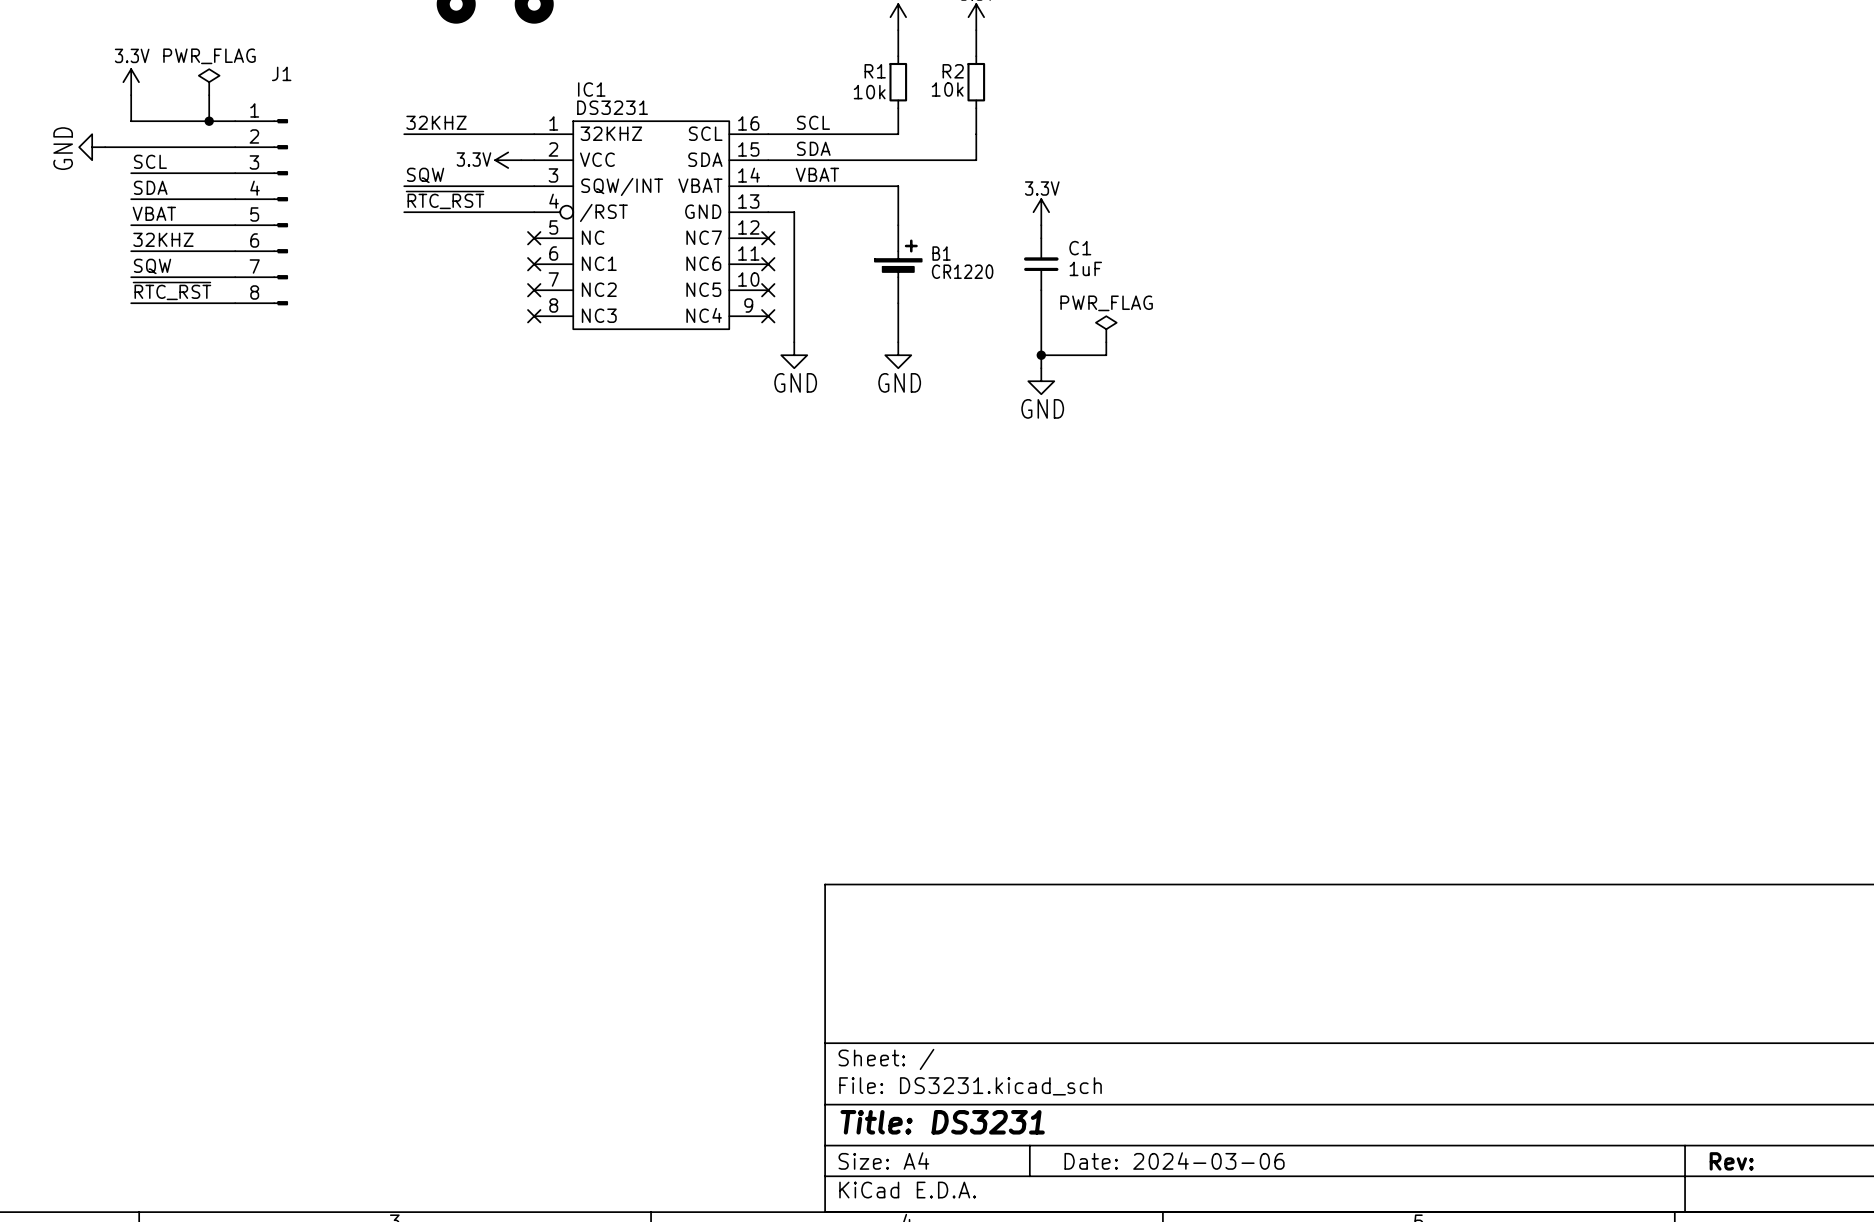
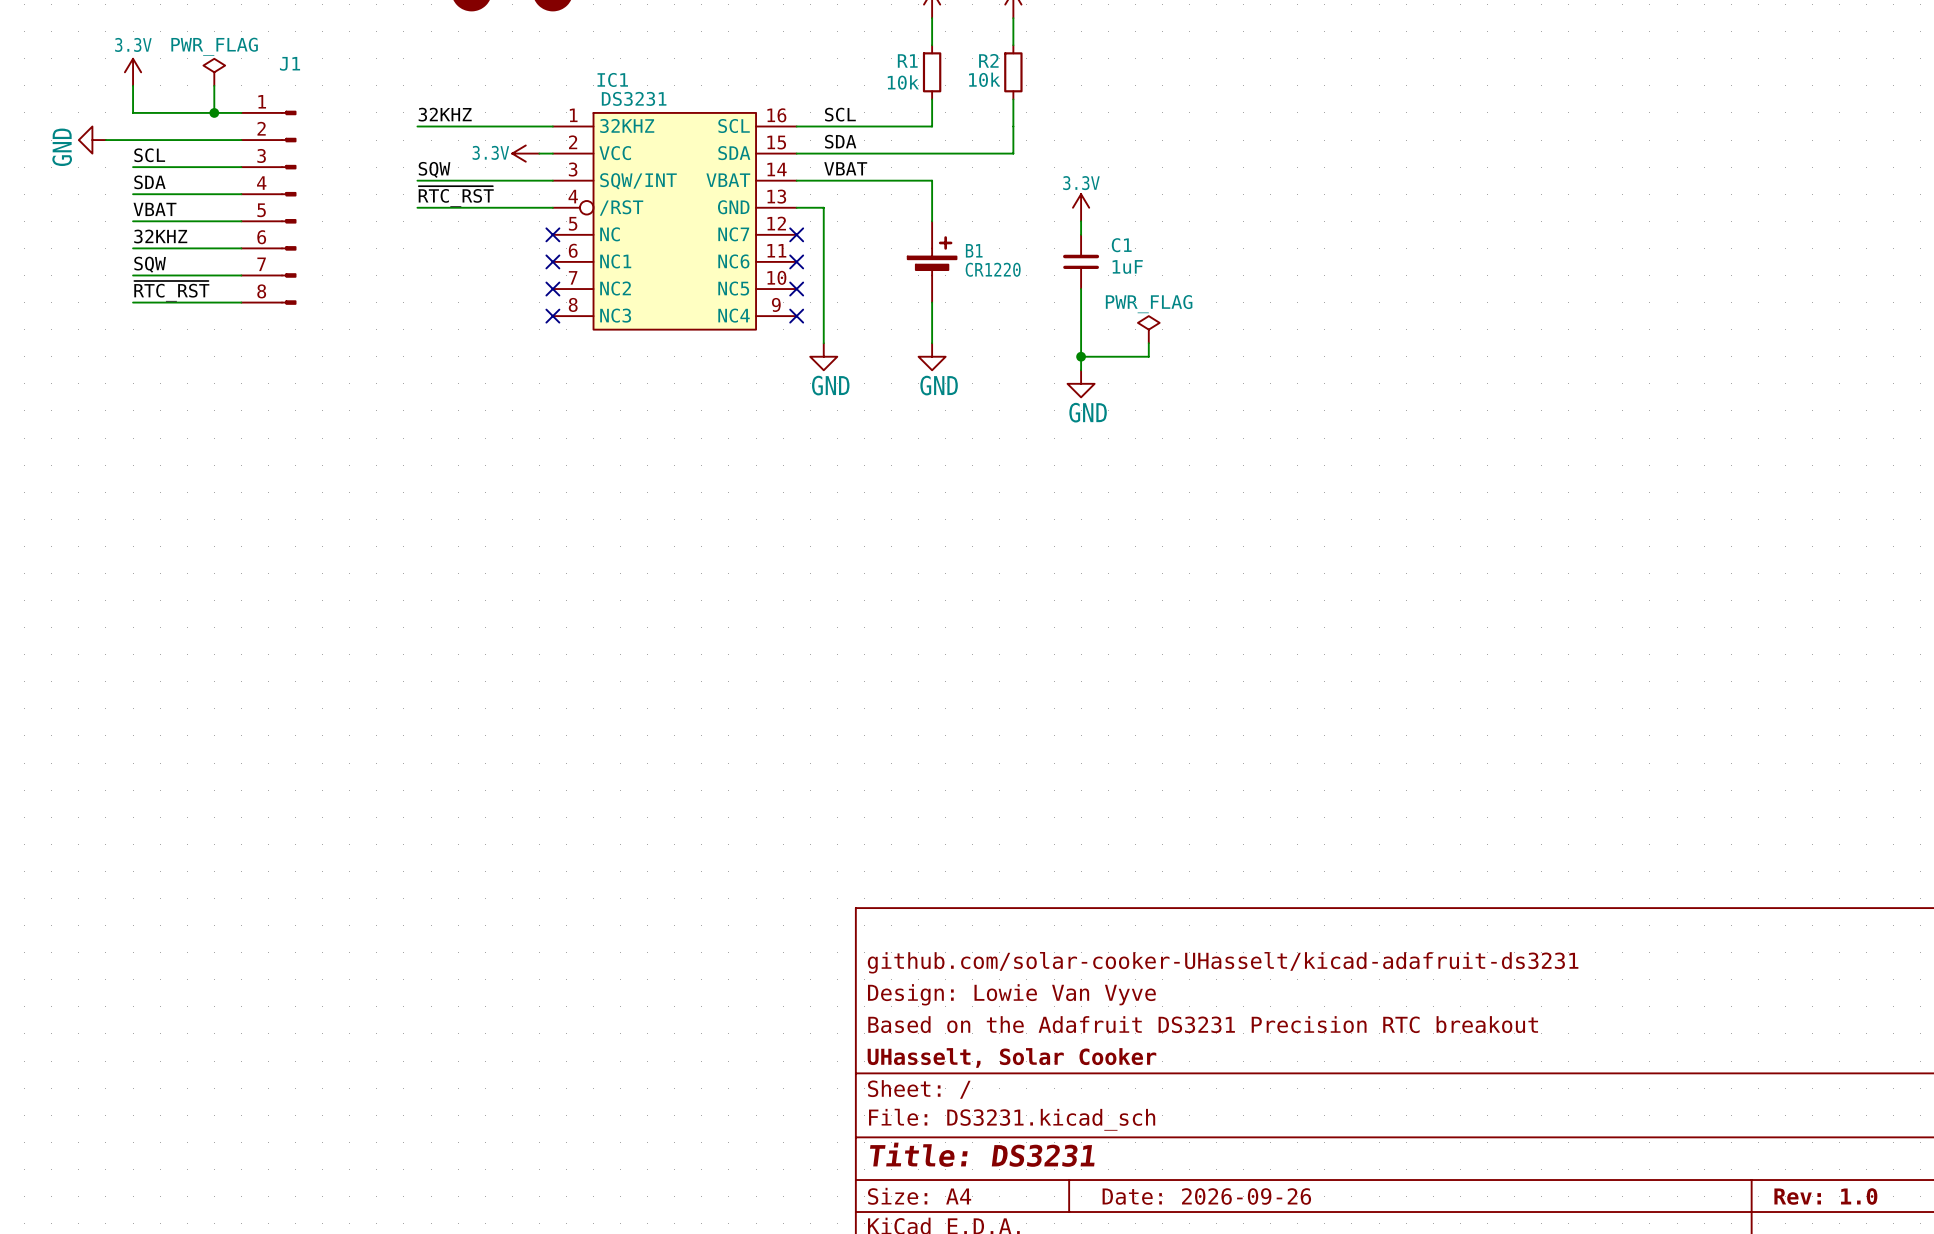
title block: none -> github.com/solar-cooker-UHasselt/kicad-adafruit-ds3231 (1223, 962)
title block: none -> Design: Lowie Van Vyve (1011, 994)
title block: none -> Based on the Adafruit DS3231 Precision RTC breakout (1203, 1024)
title block: none -> UHasselt, Solar Cooker (1011, 1057)
title block: Date: 2024-03-06 (1174, 1161) -> Date: 2026-09-26 (1206, 1196)
title block: Rev: (1731, 1161) -> Rev: 1.0 (1825, 1196)

